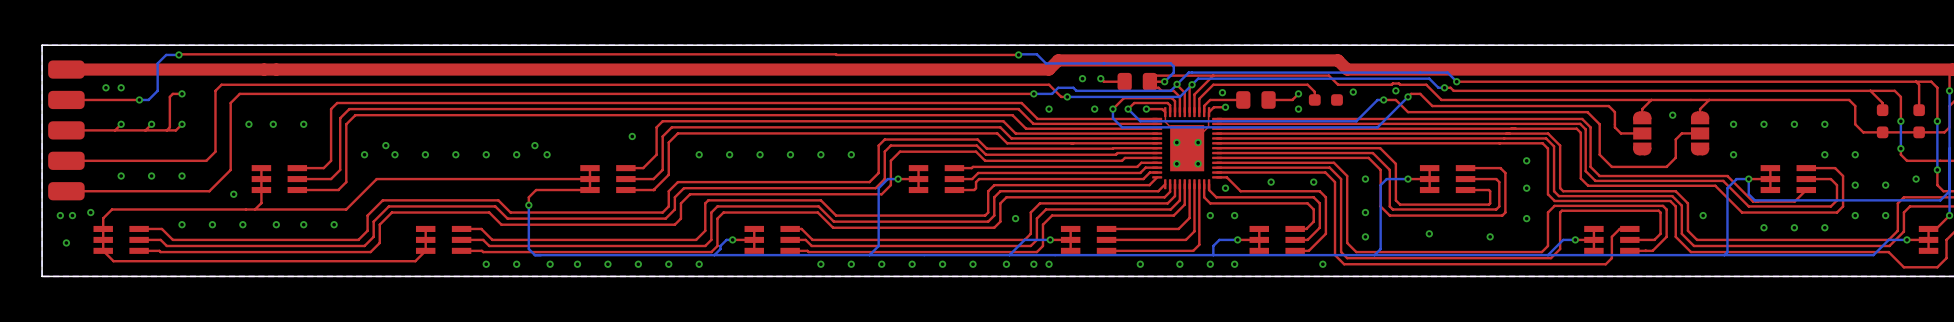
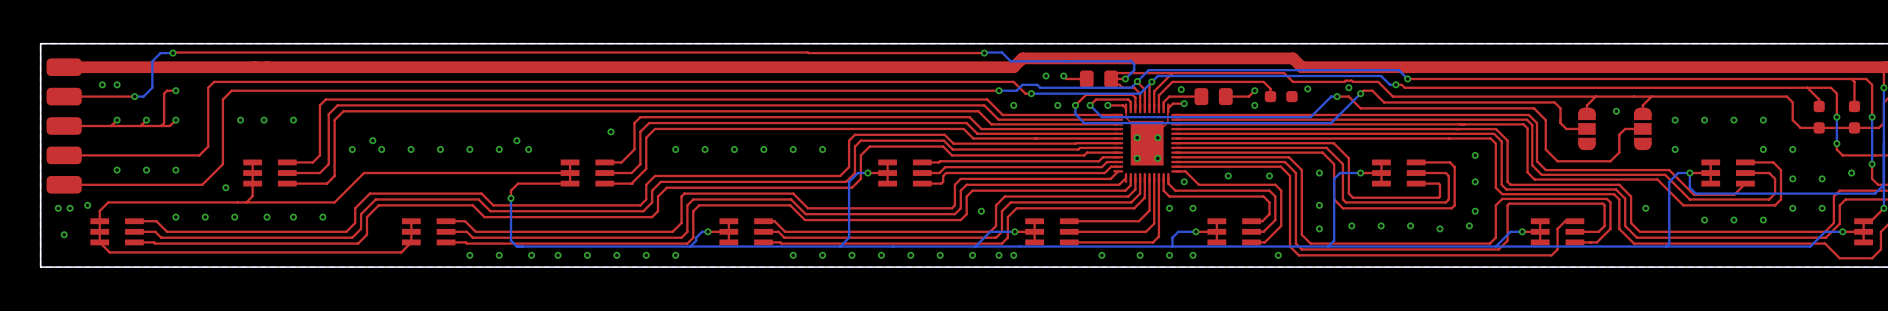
via: none -> (1351, 225)
via: none -> (1410, 225)
via: none -> (1469, 225)

